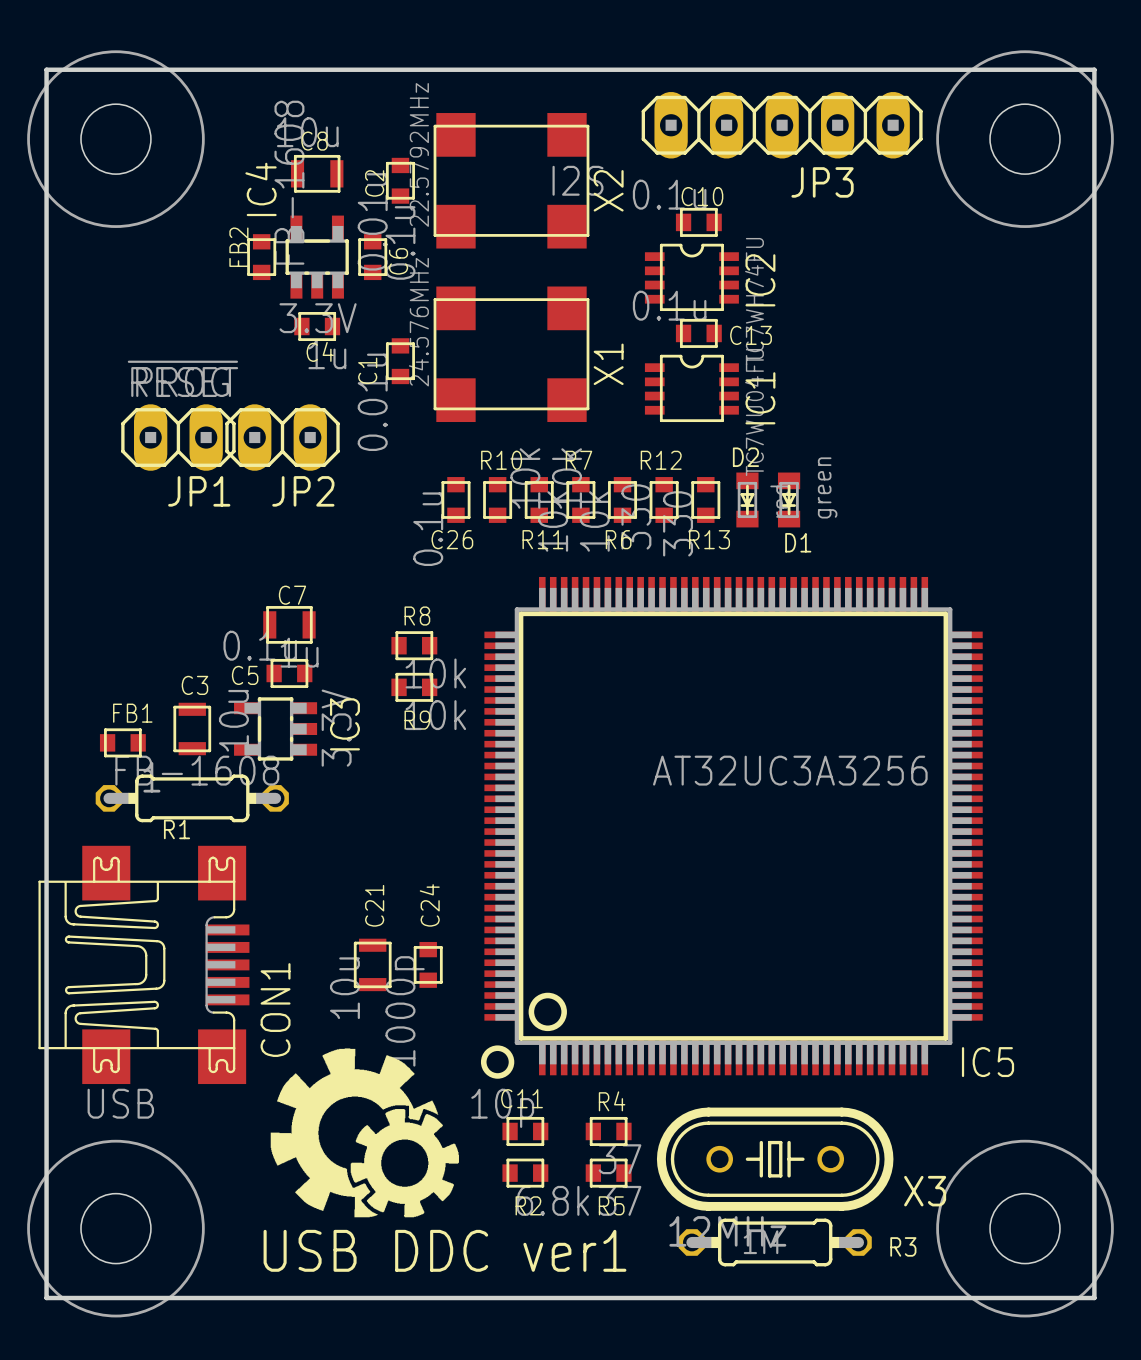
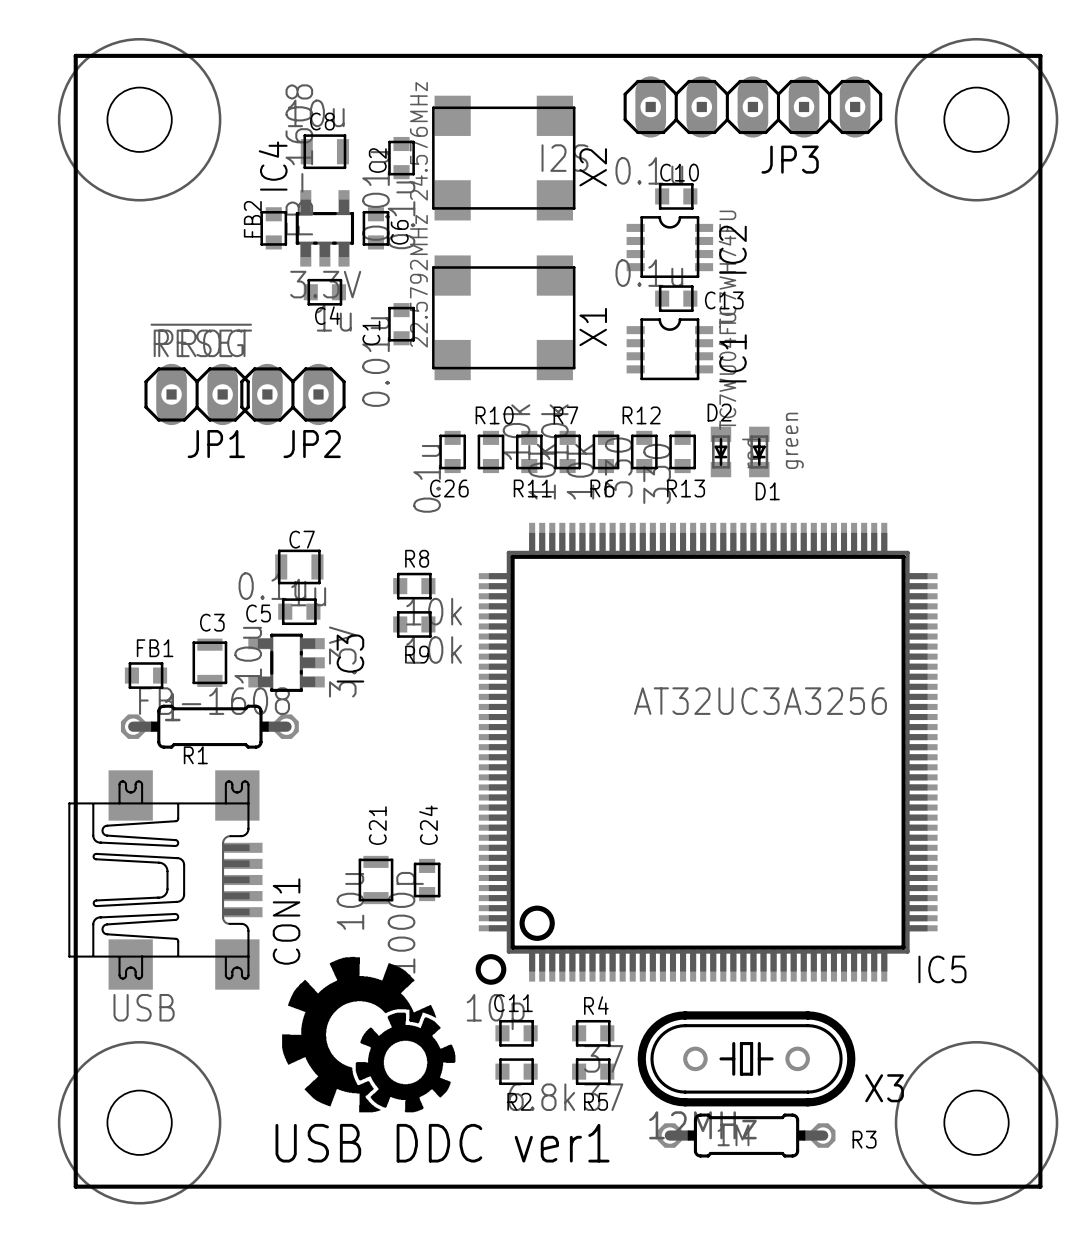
X2 value: 22.5792MHz (419, 154) -> 24.576MHz (418, 141)
X1 value: 24.576MHz (418, 322) -> 22.5792MHz (418, 281)

